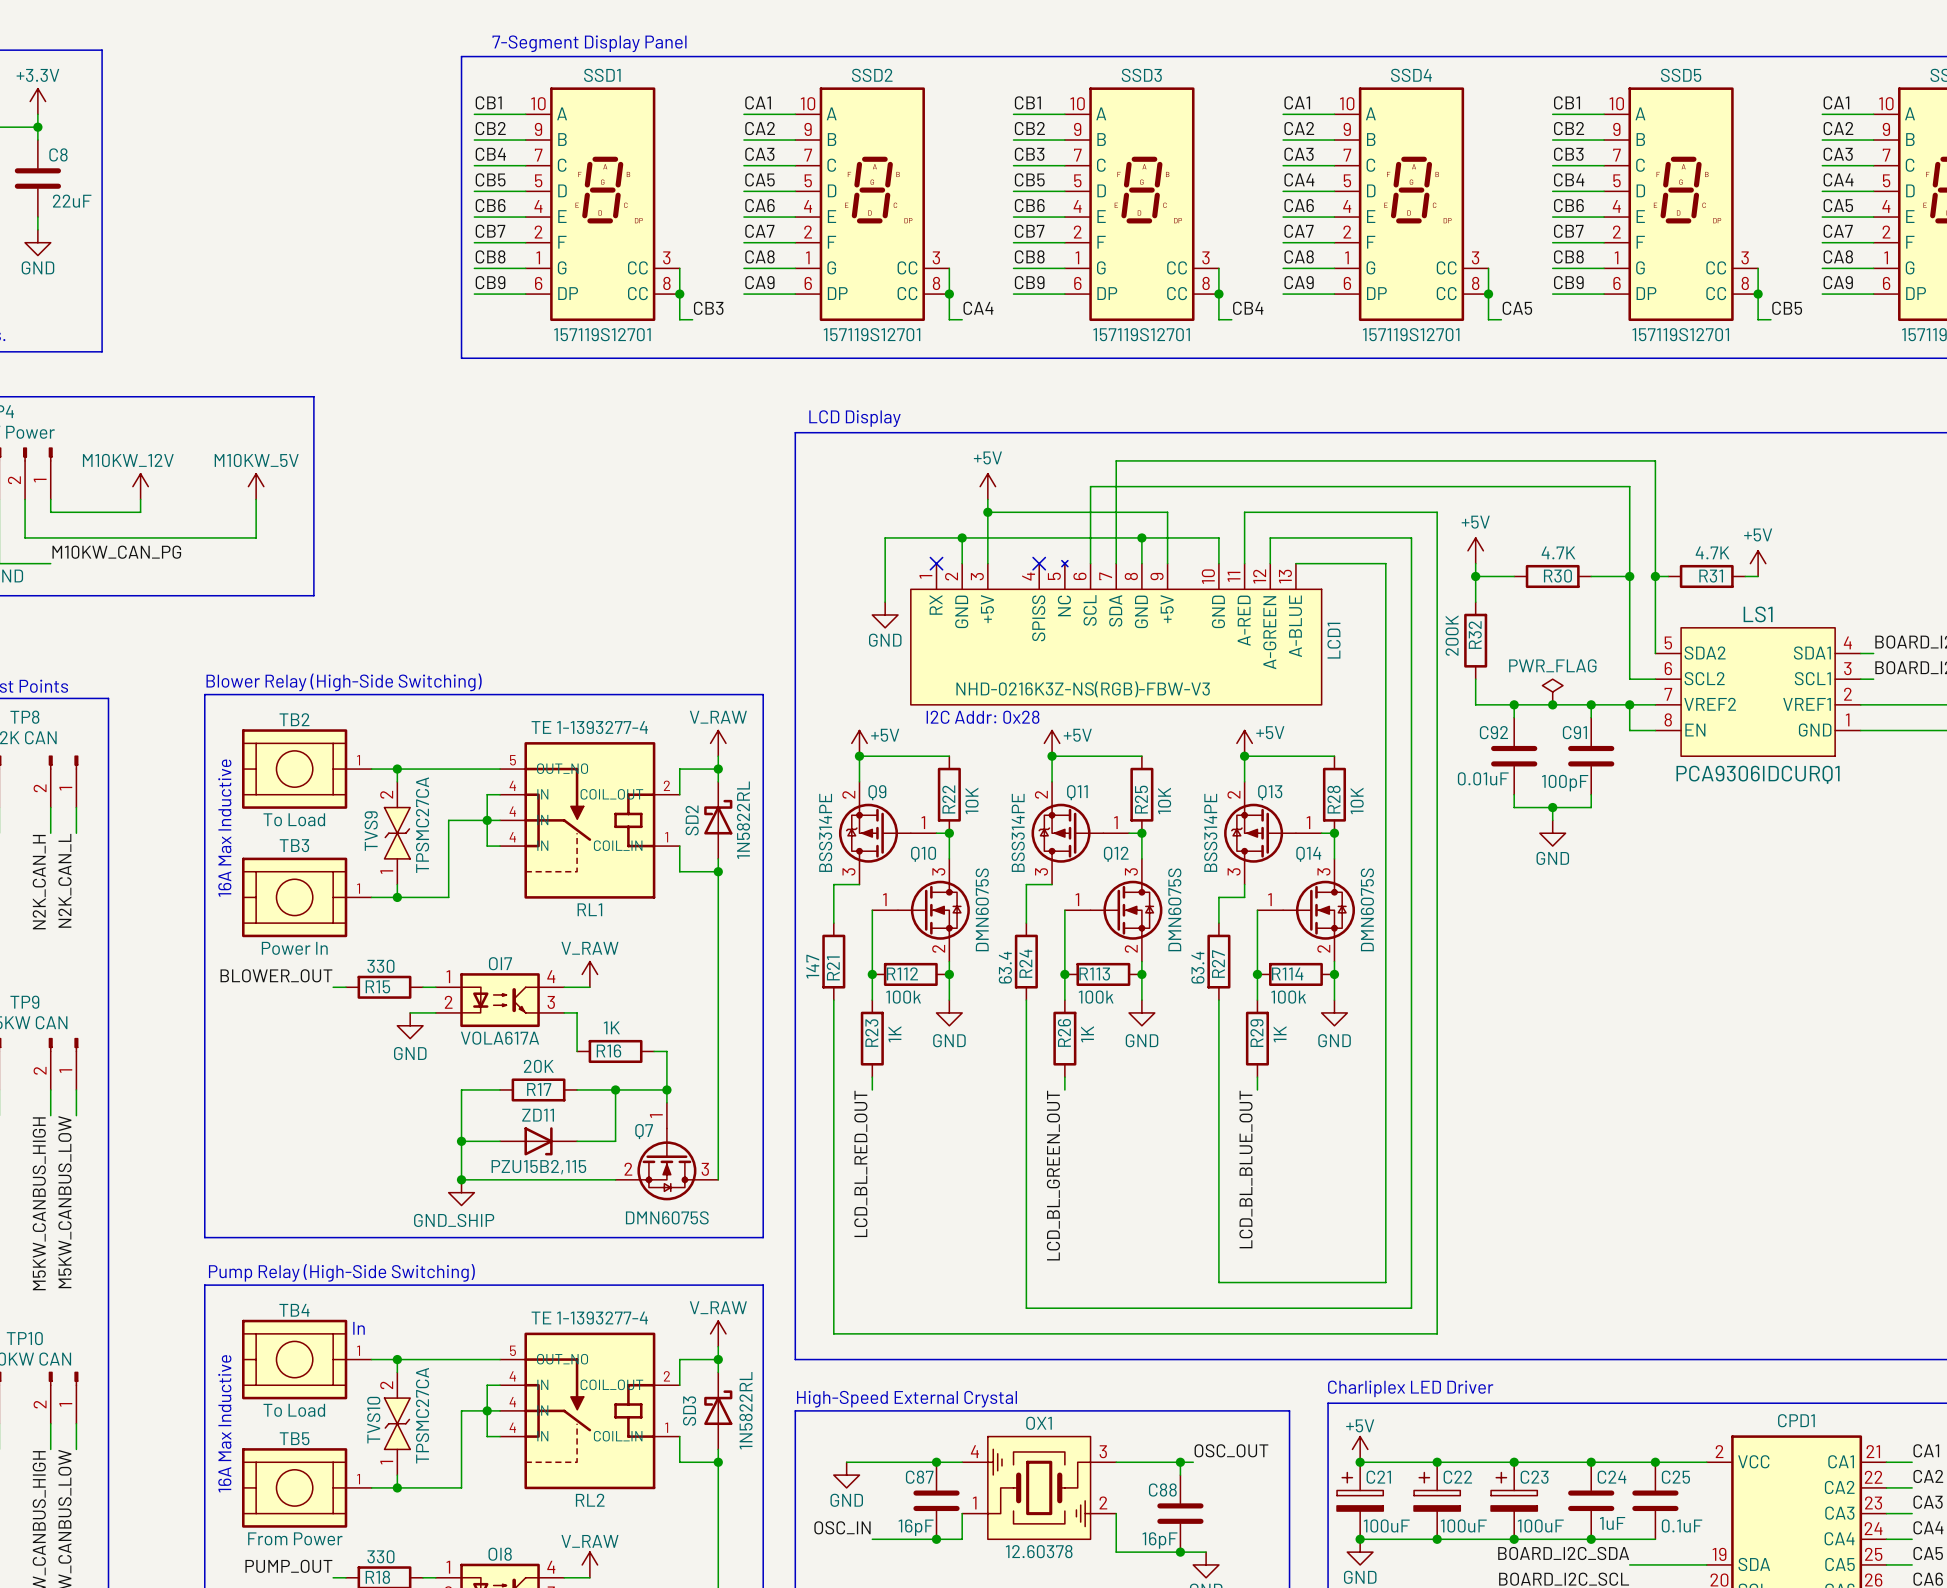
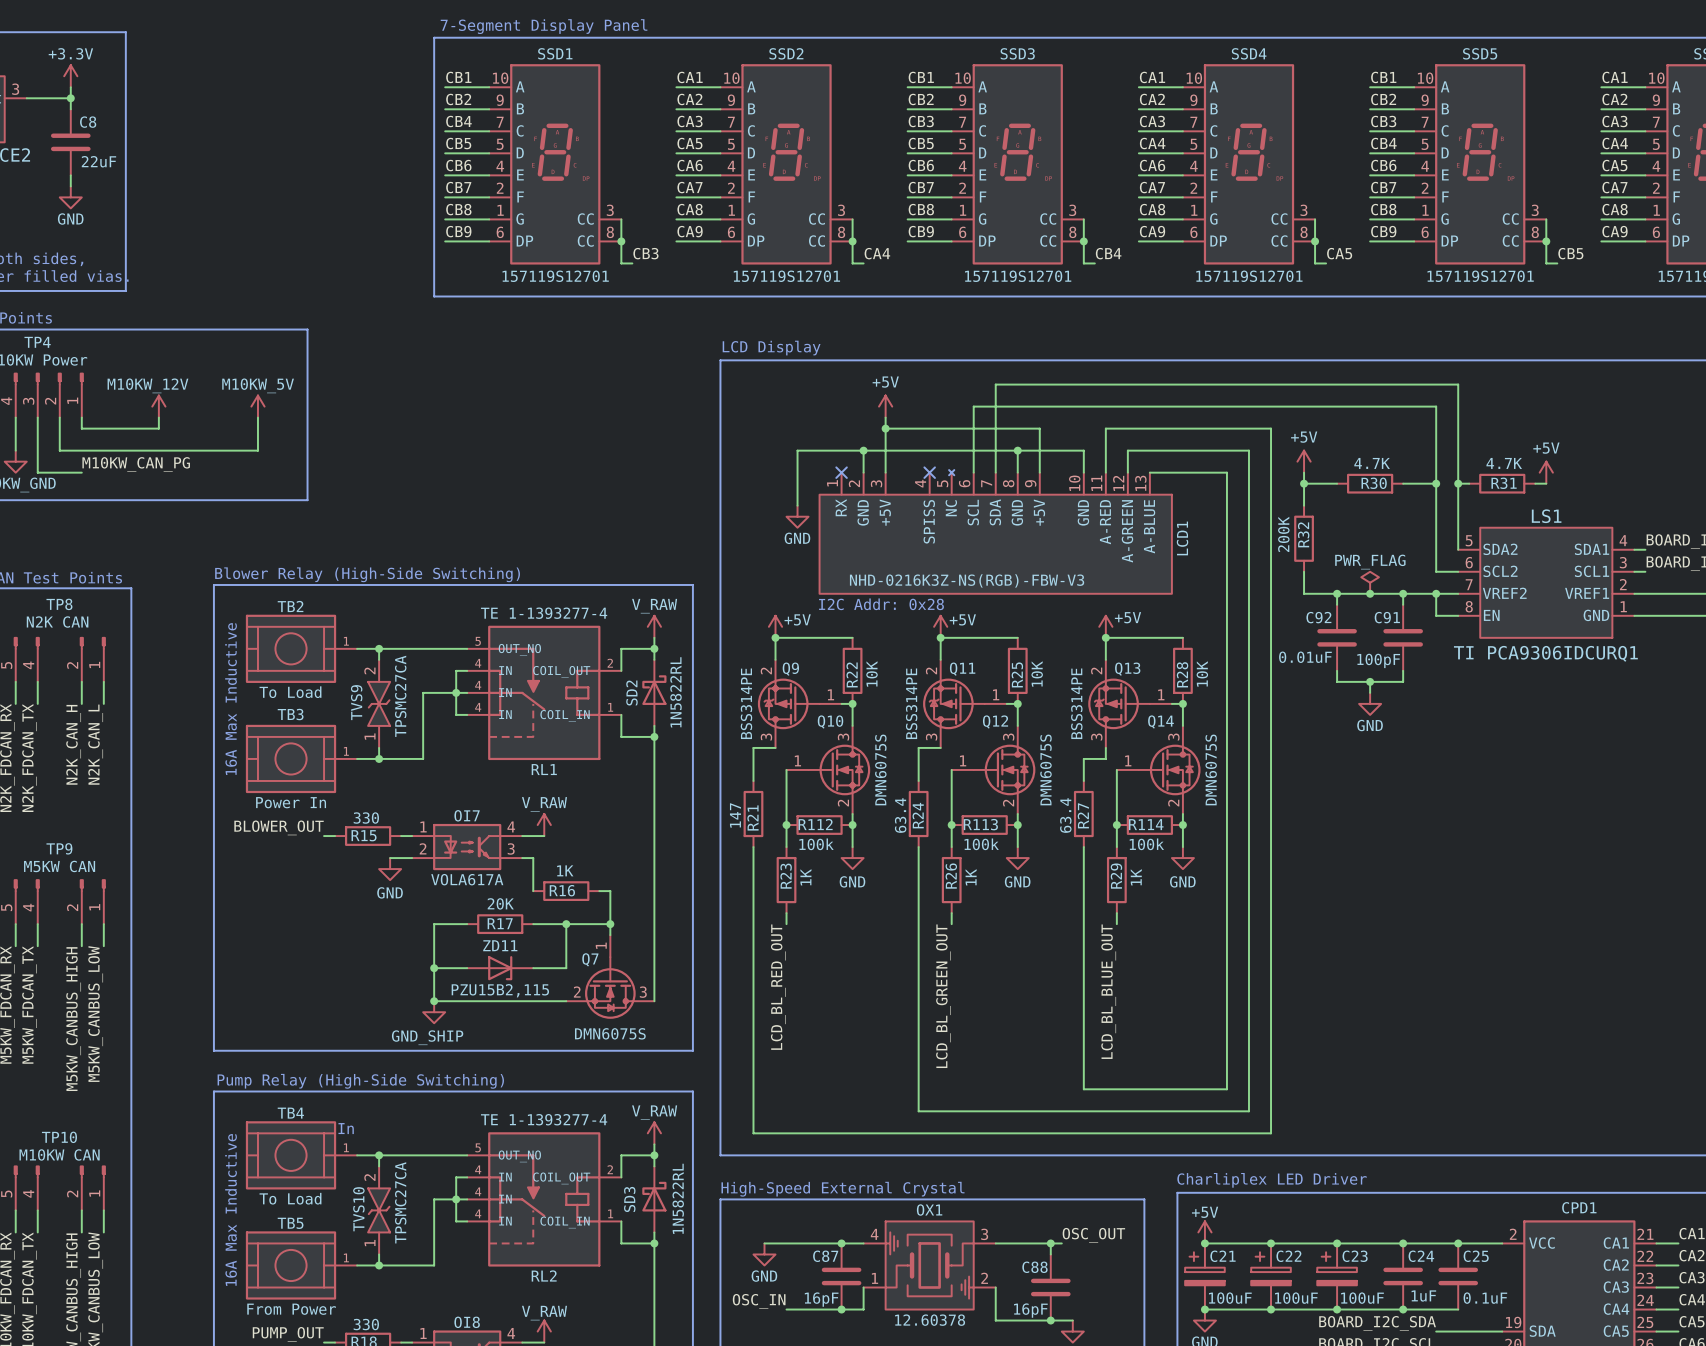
LS1 value: PCA9306IDCURQ1 (1758, 774) -> TI PCA9306IDCURQ1 (1545, 653)

